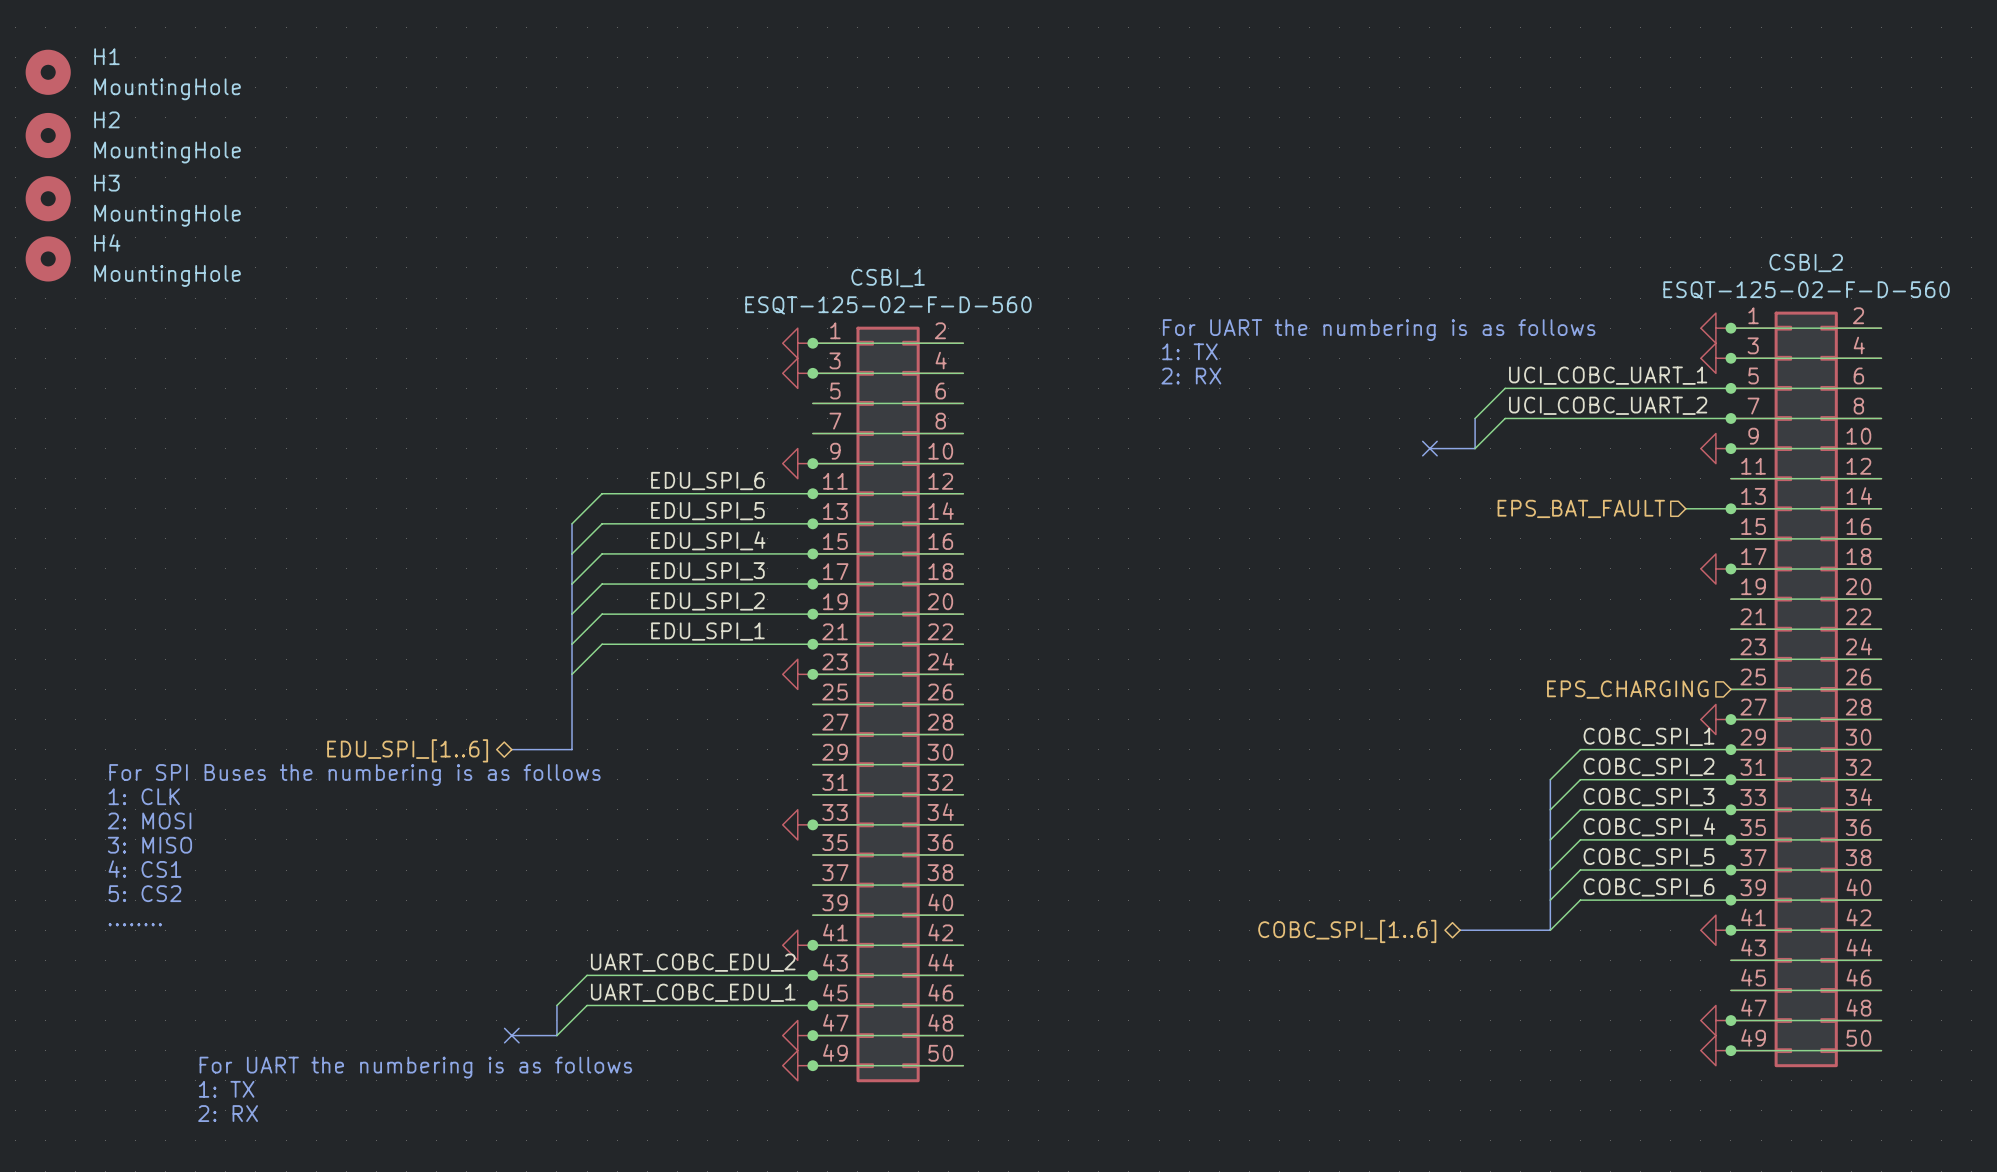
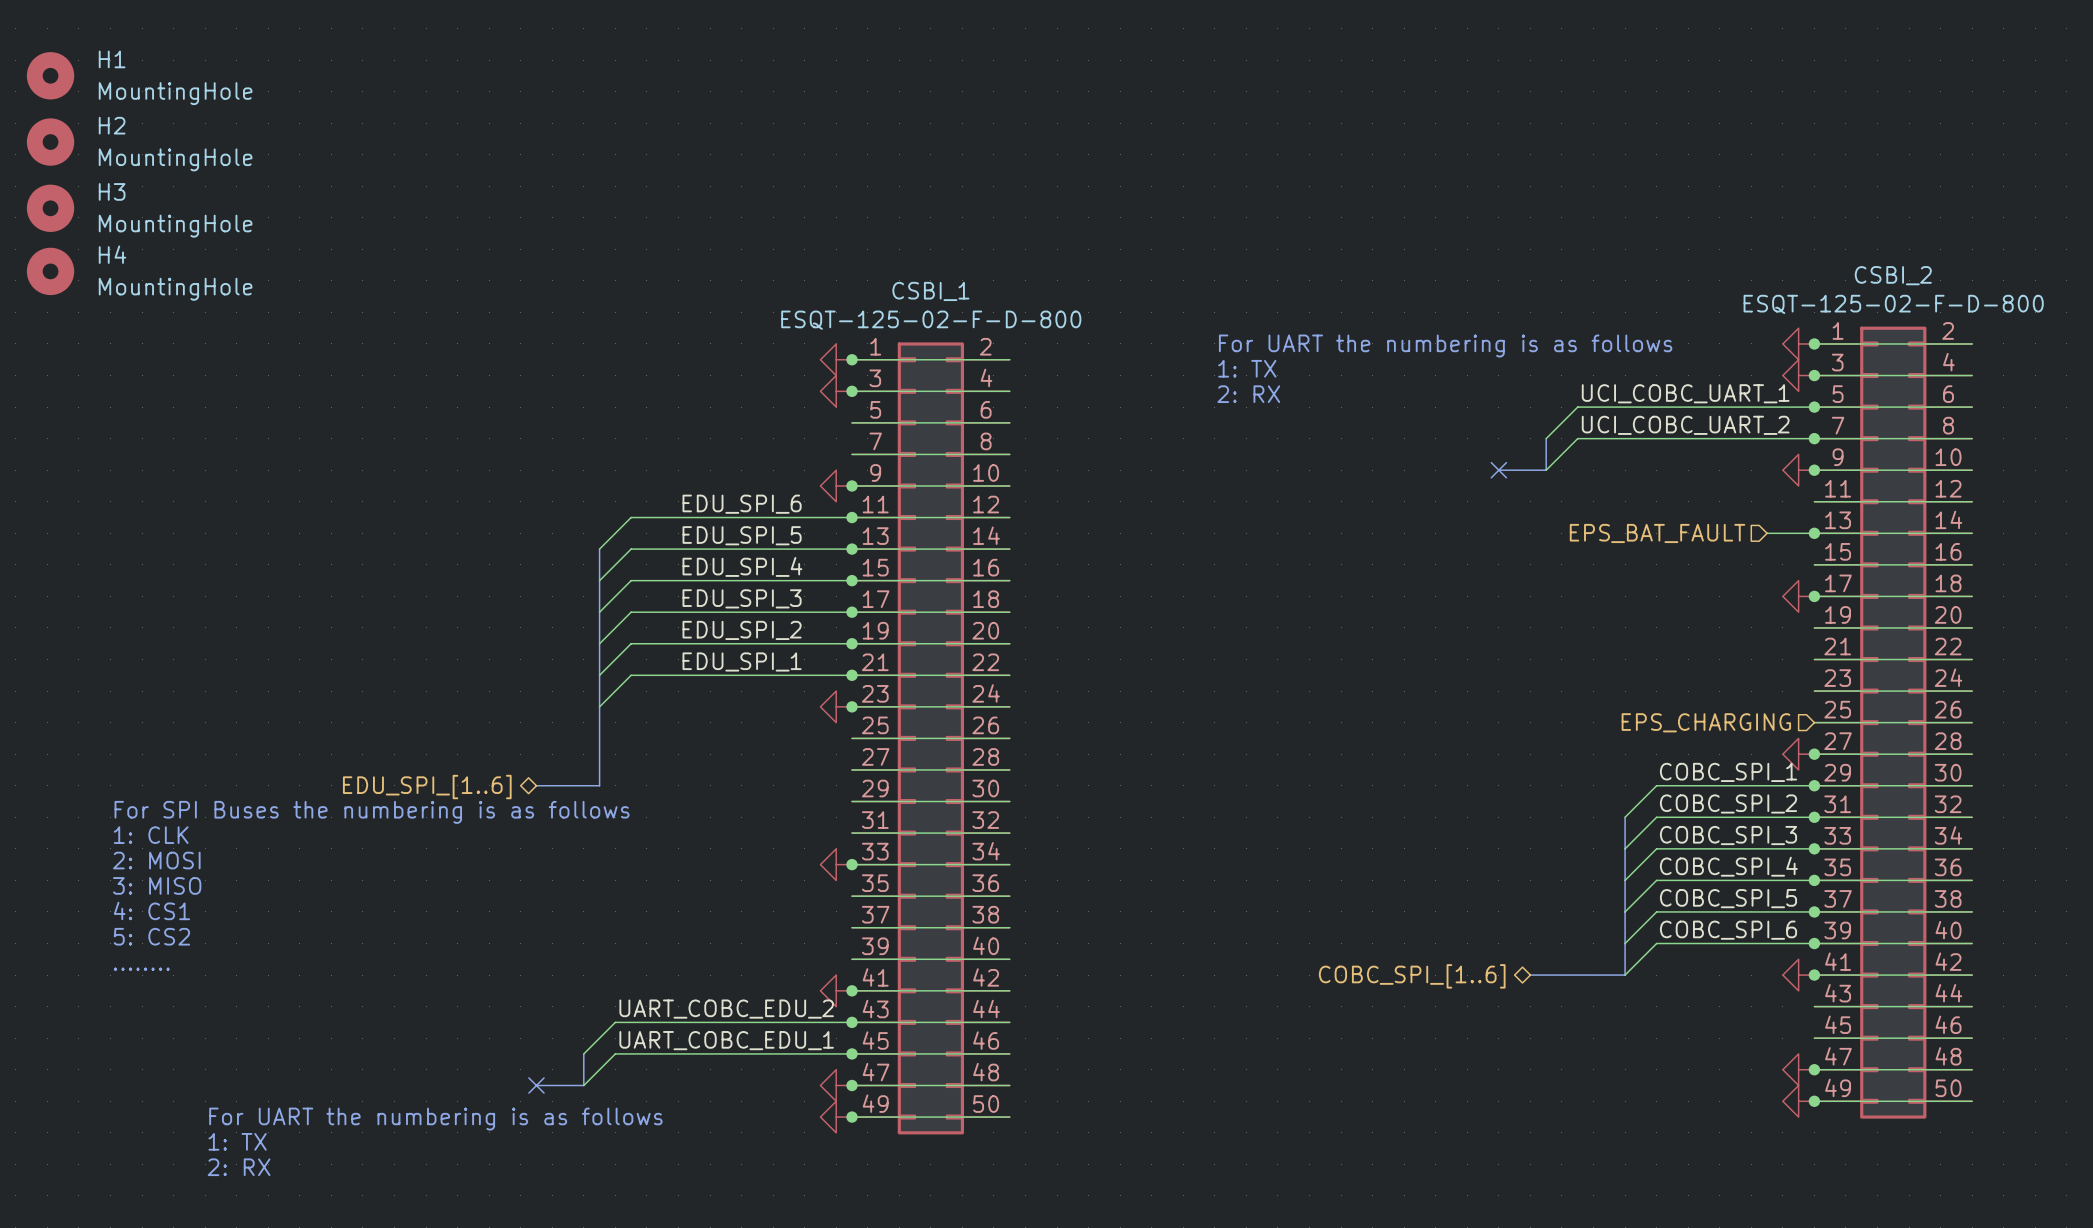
CSBI_2 value: ESQT-125-02-F-D-560 (1806, 290) -> ESQT-125-02-F-D-800 (1893, 304)
CSBI_1 value: ESQT-125-02-F-D-560 (888, 305) -> ESQT-125-02-F-D-800 (931, 320)

